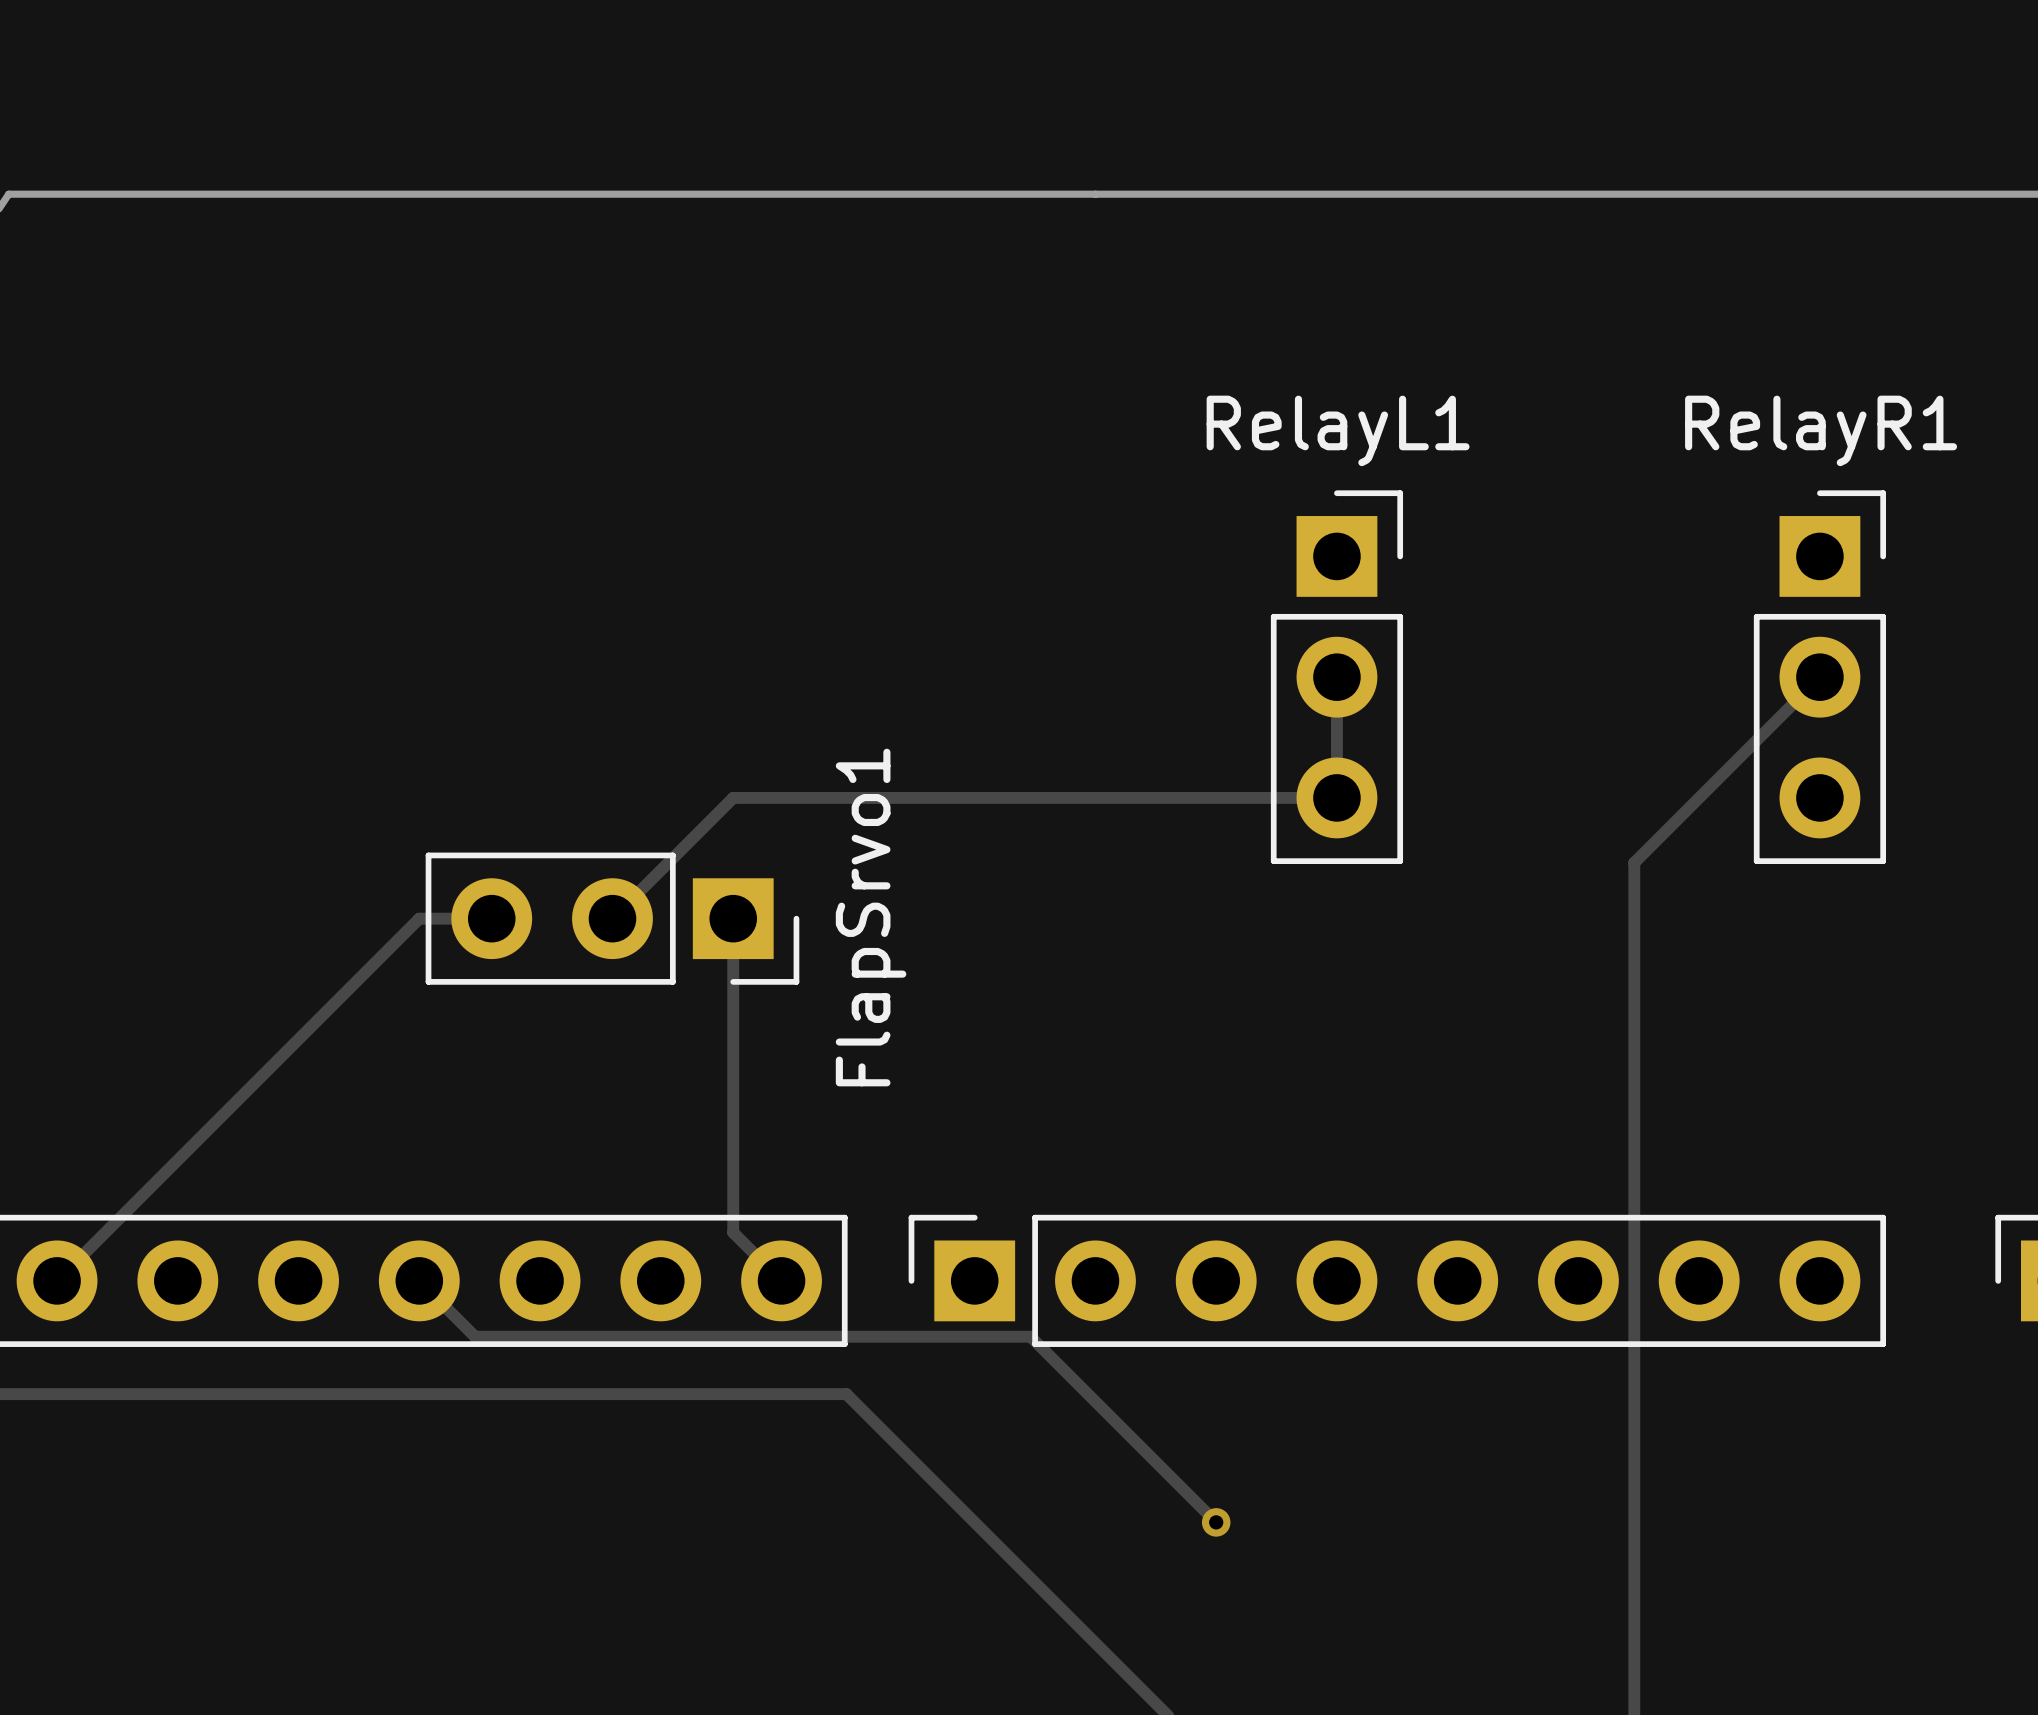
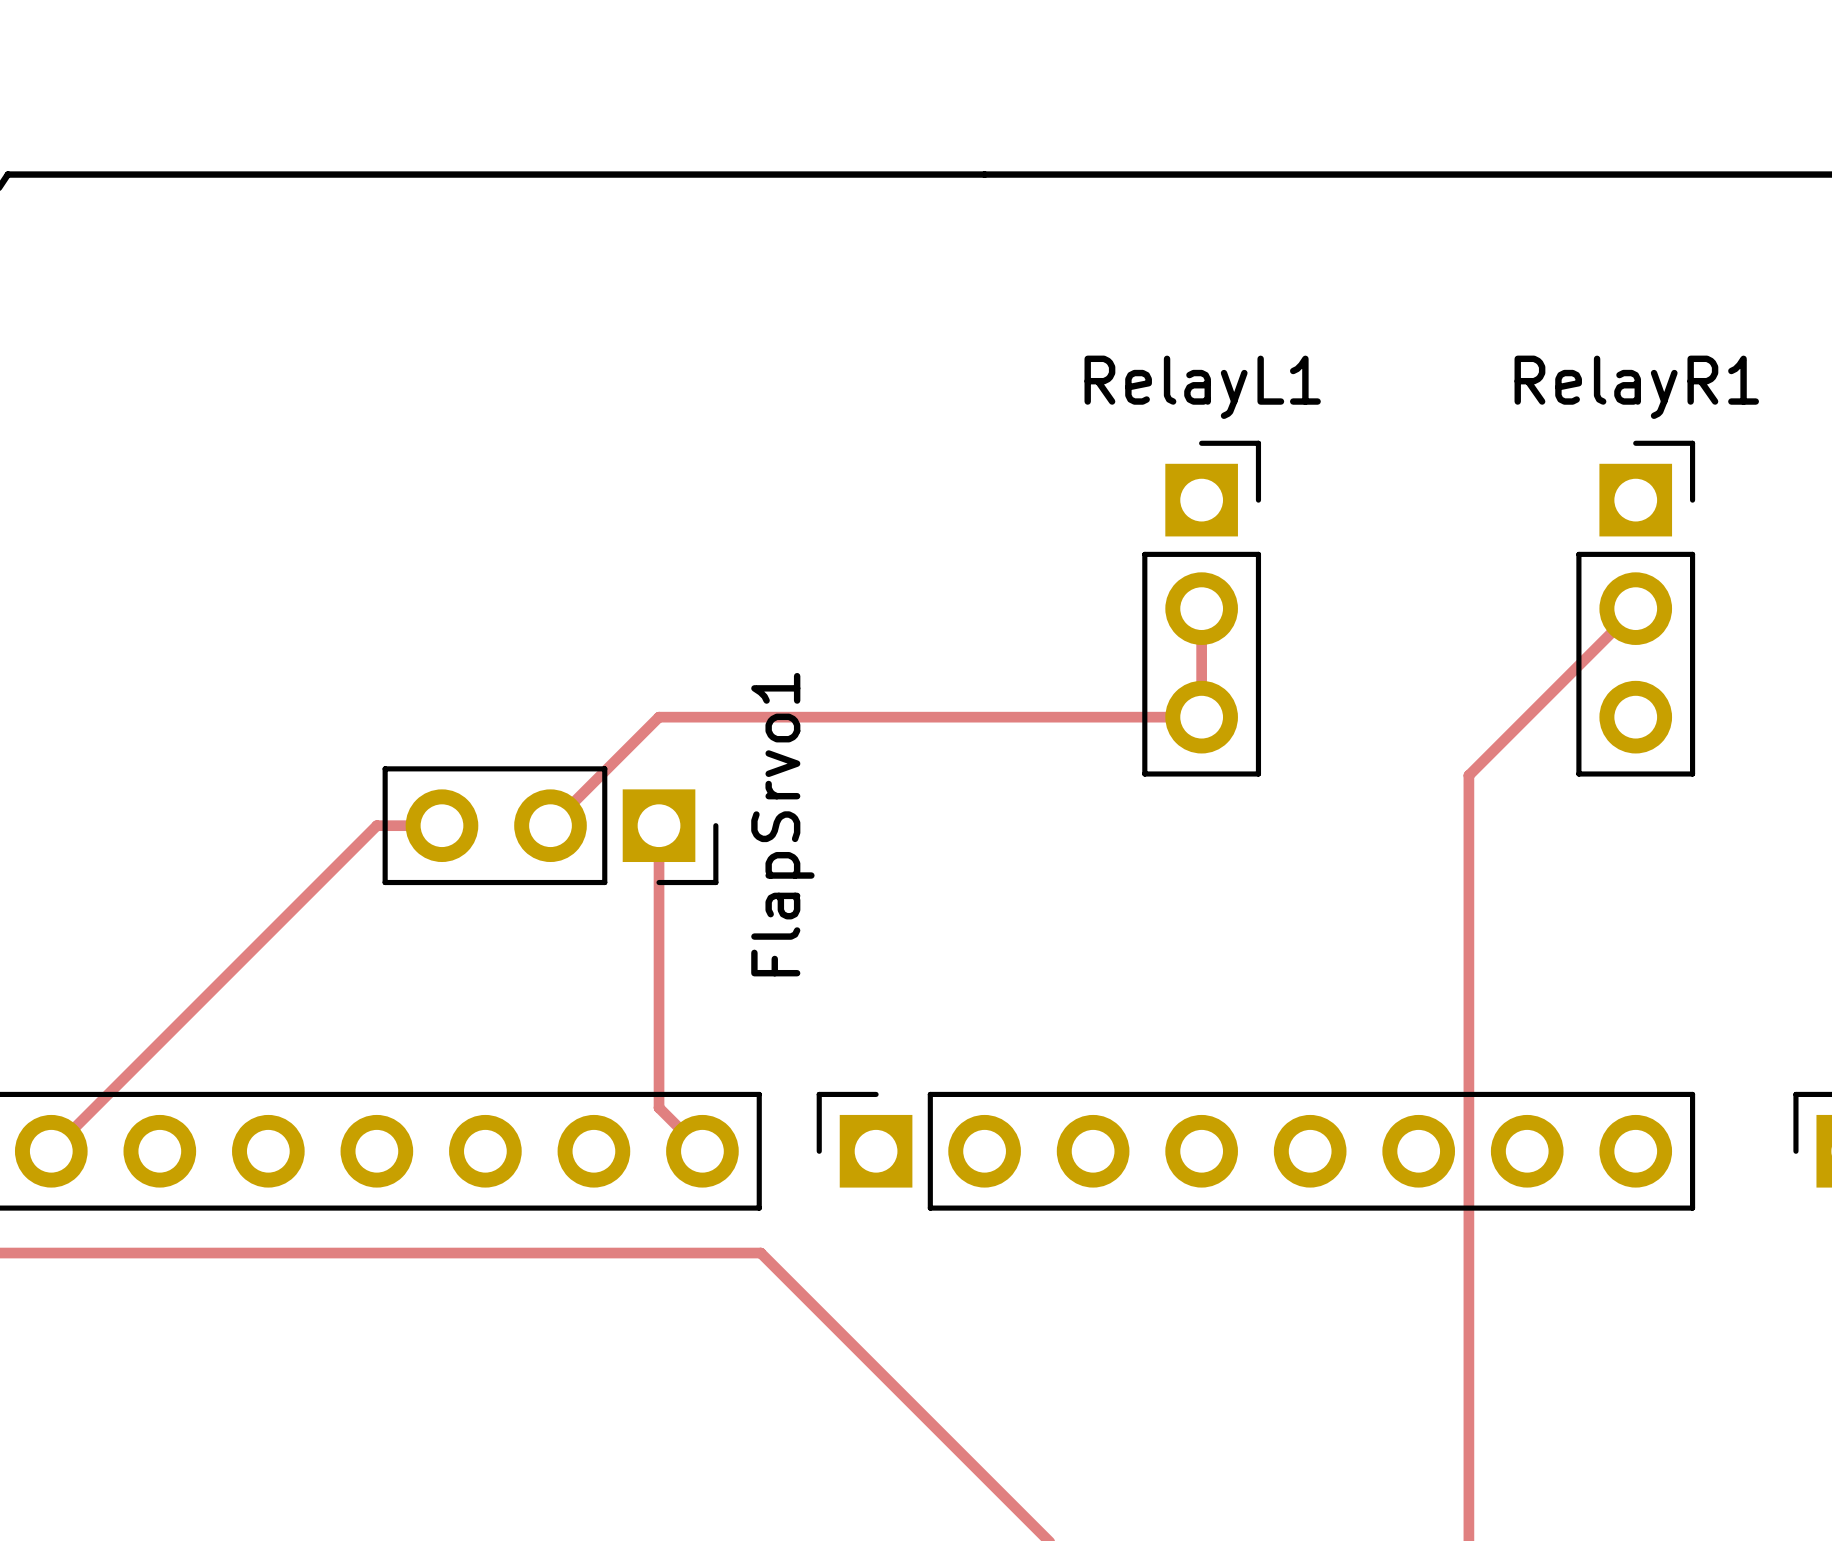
track: (419, 1280) (475, 1336) (1030, 1336) (1216, 1522) -> none
via: (1216, 1522) -> none

